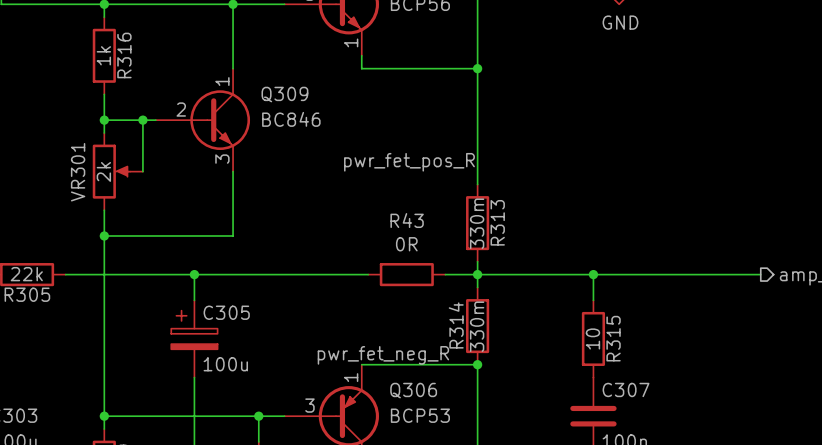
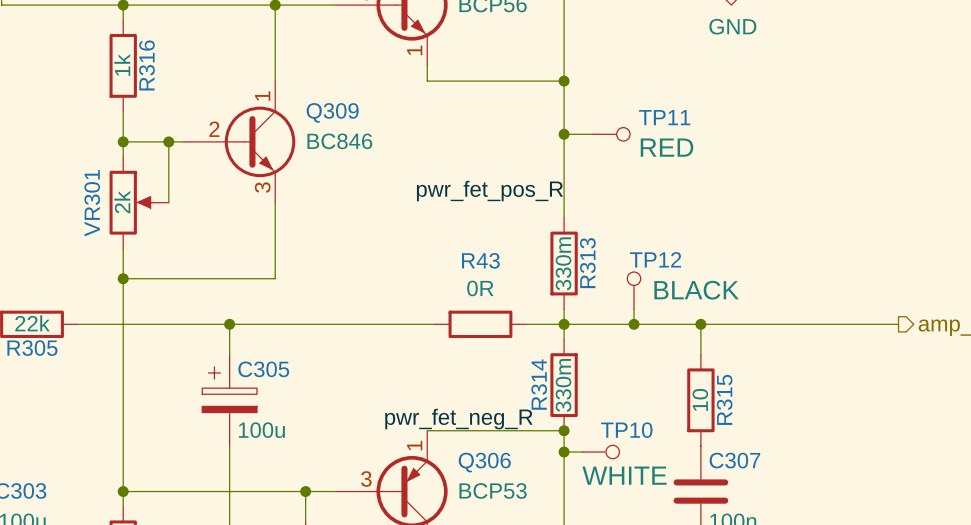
wire: none -> (564, 134) (592, 134)
junction: none -> (564, 134)
TP11: none -> (611, 134)
TP12: none -> (634, 290)
wire: none -> (634, 309) (634, 324)
junction: none -> (634, 324)
wire: none -> (564, 452) (582, 452)
junction: none -> (564, 452)
TP10: none -> (600, 452)

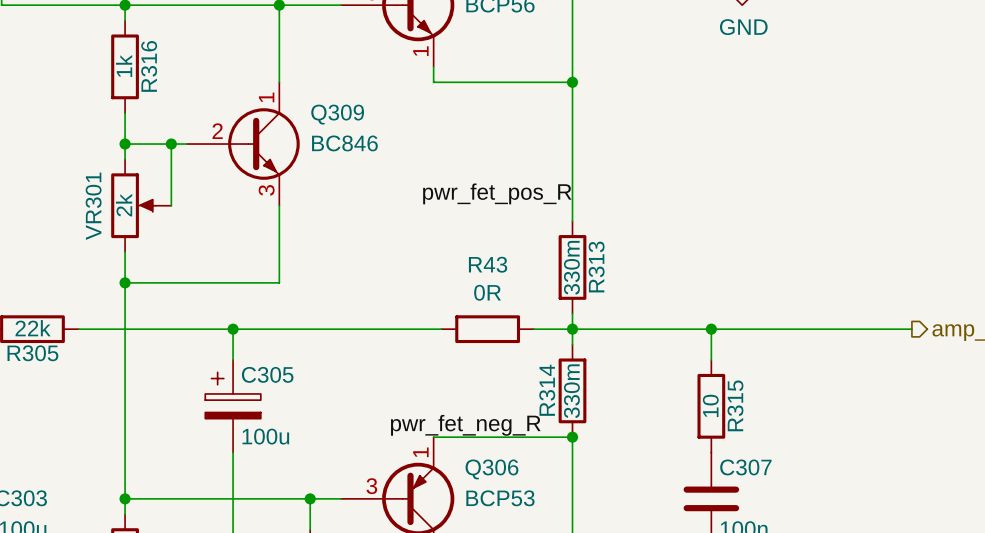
wire: (564, 134) (592, 134) -> none
junction: (564, 134) -> none
TP11: (611, 134) -> none
TP12: (634, 290) -> none
wire: (634, 309) (634, 324) -> none
junction: (634, 324) -> none
wire: (564, 452) (582, 452) -> none
junction: (564, 452) -> none
TP10: (600, 452) -> none

